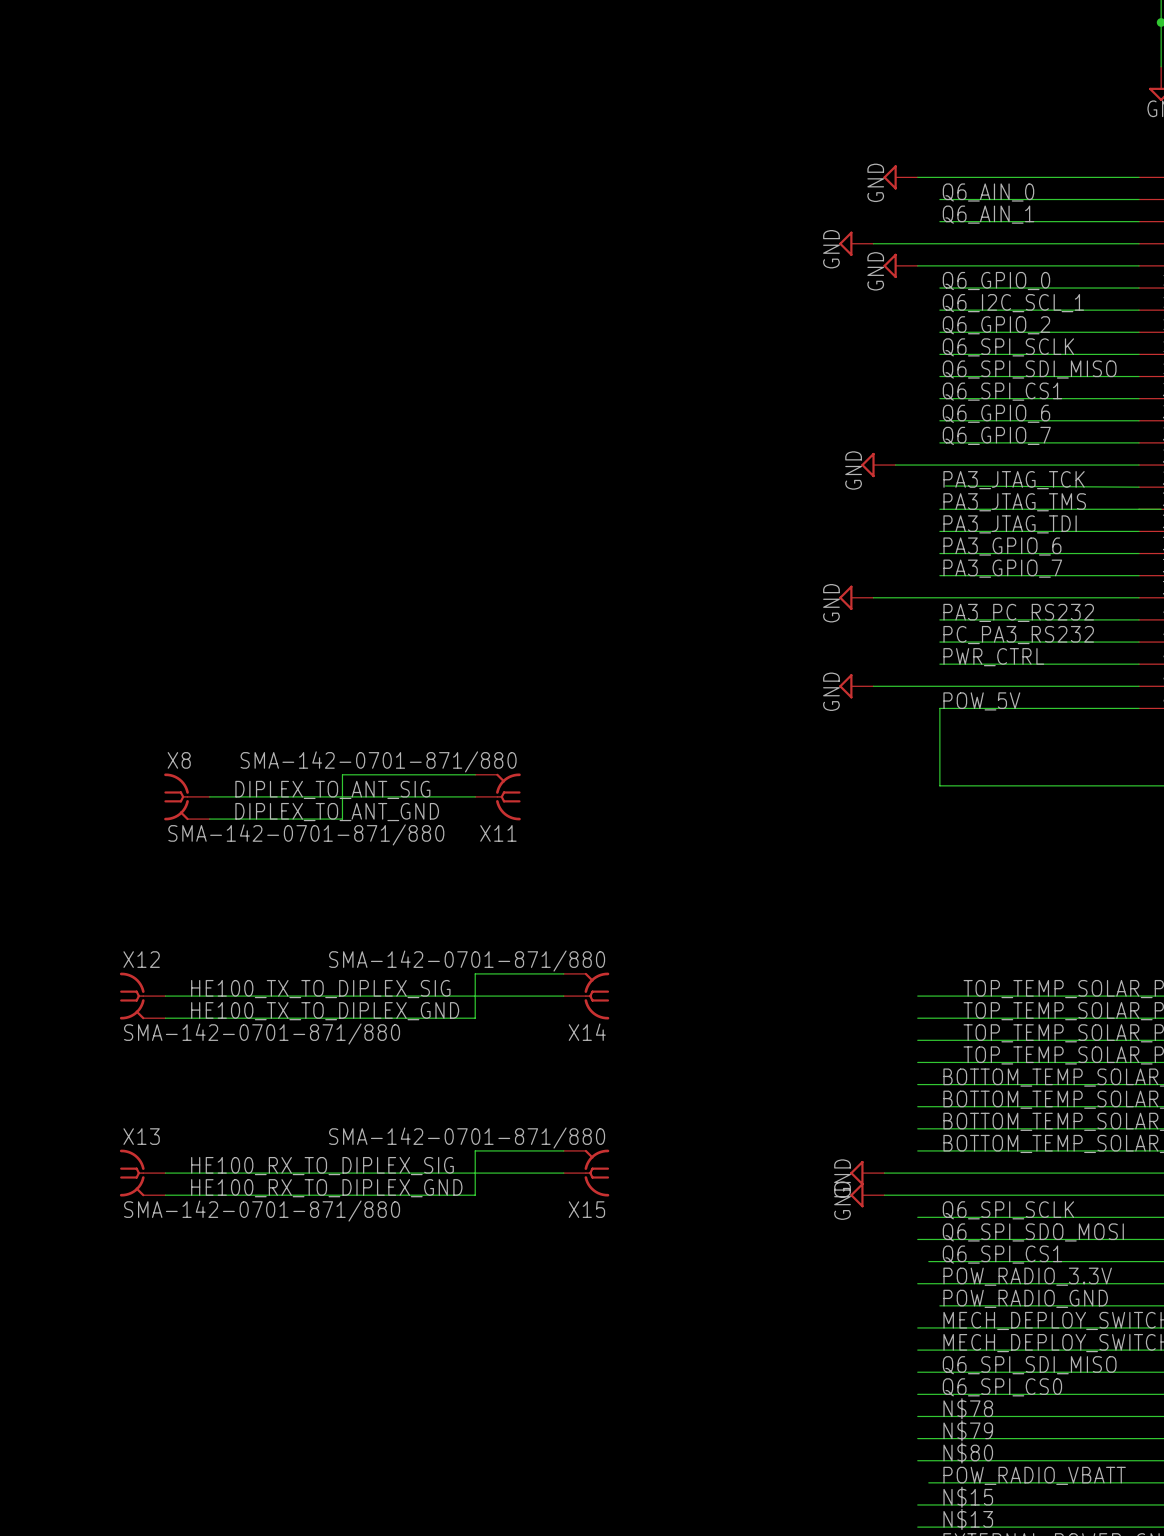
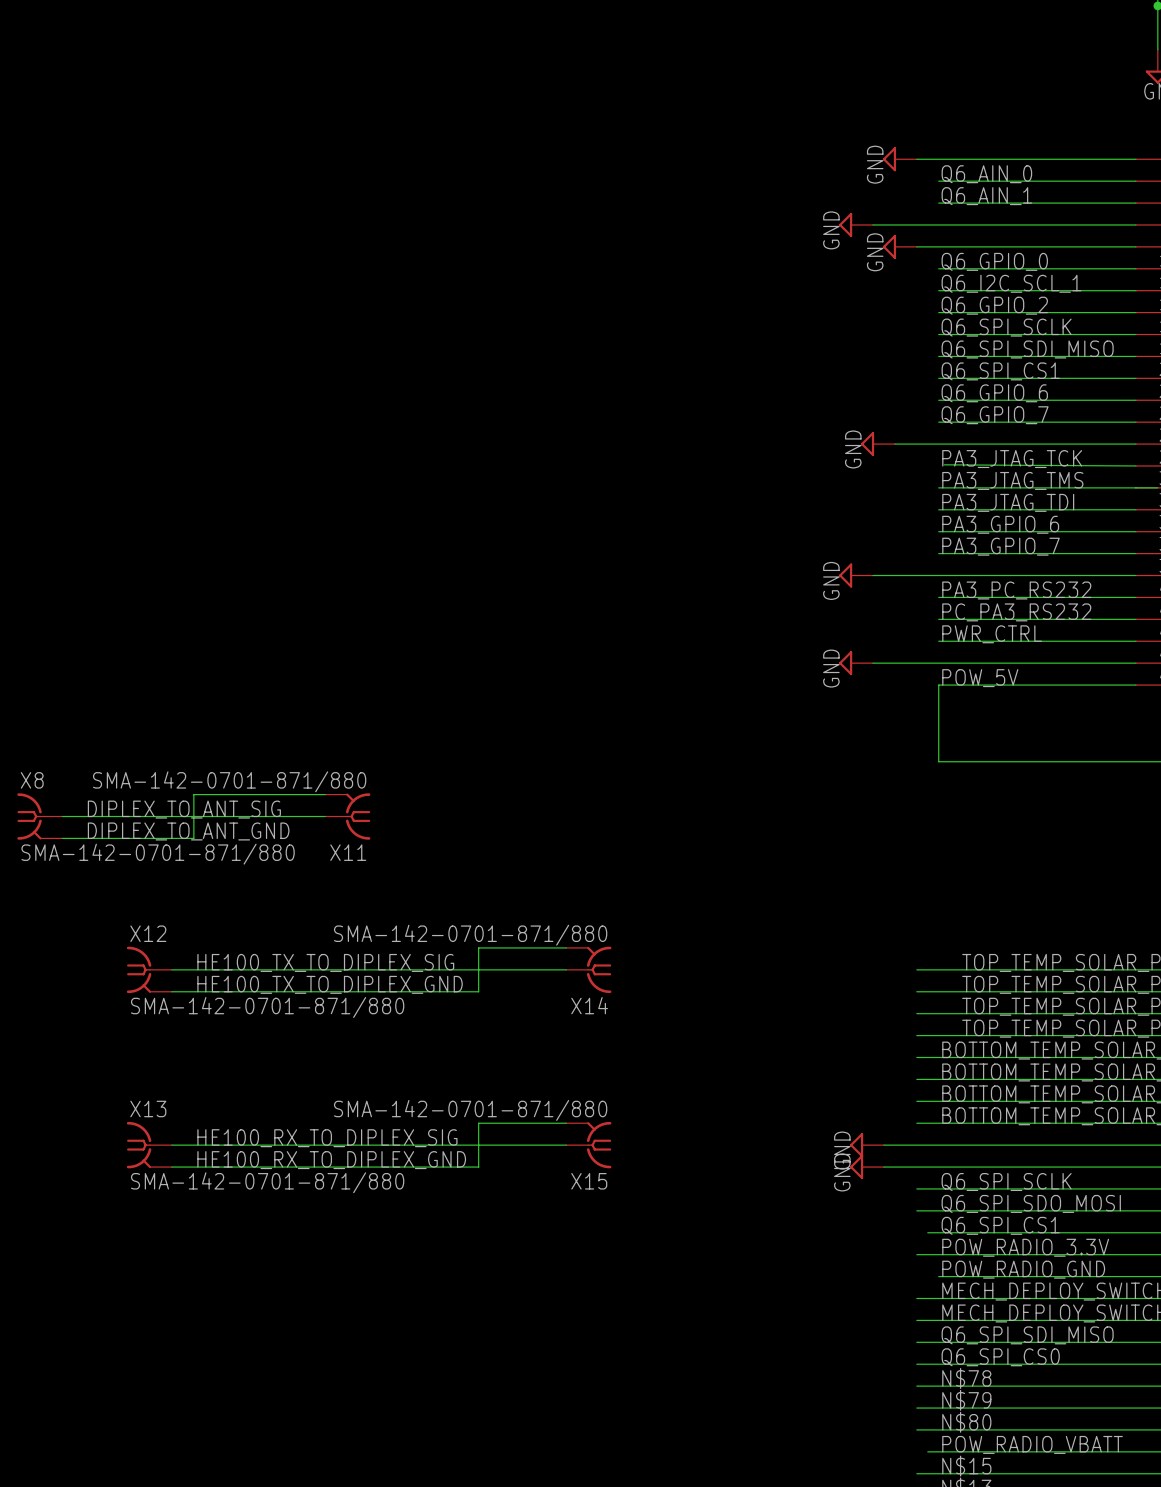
wire: (475, 774) (342, 774) (342, 819) (320, 819) -> none
label position: DIPLEX_TO_ANT_SIG (332, 789) -> DIPLEX_TO_ANT_SIG (184, 809)
X8 position: (186, 796) -> (39, 816)
wire: (209, 796) (475, 796) -> (62, 816) (325, 816)
X11 position: (498, 796) -> (347, 816)
label position: DIPLEX_TO_ANT_GND (337, 812) -> DIPLEX_TO_ANT_GND (188, 831)
wire: none -> (215, 794) (193, 794) (193, 838) (62, 838)

